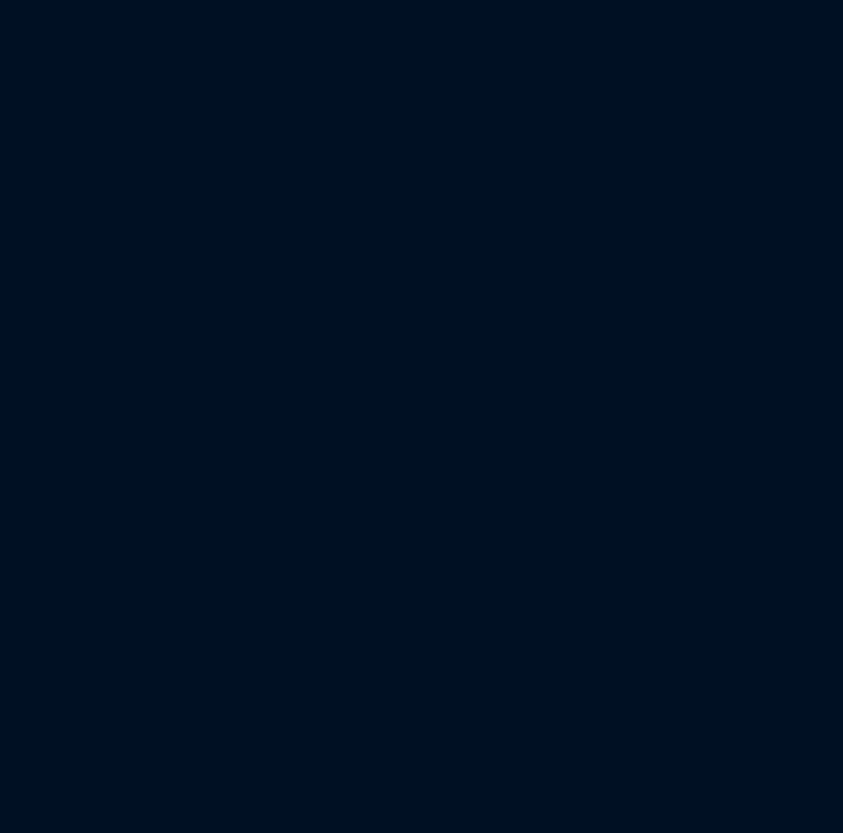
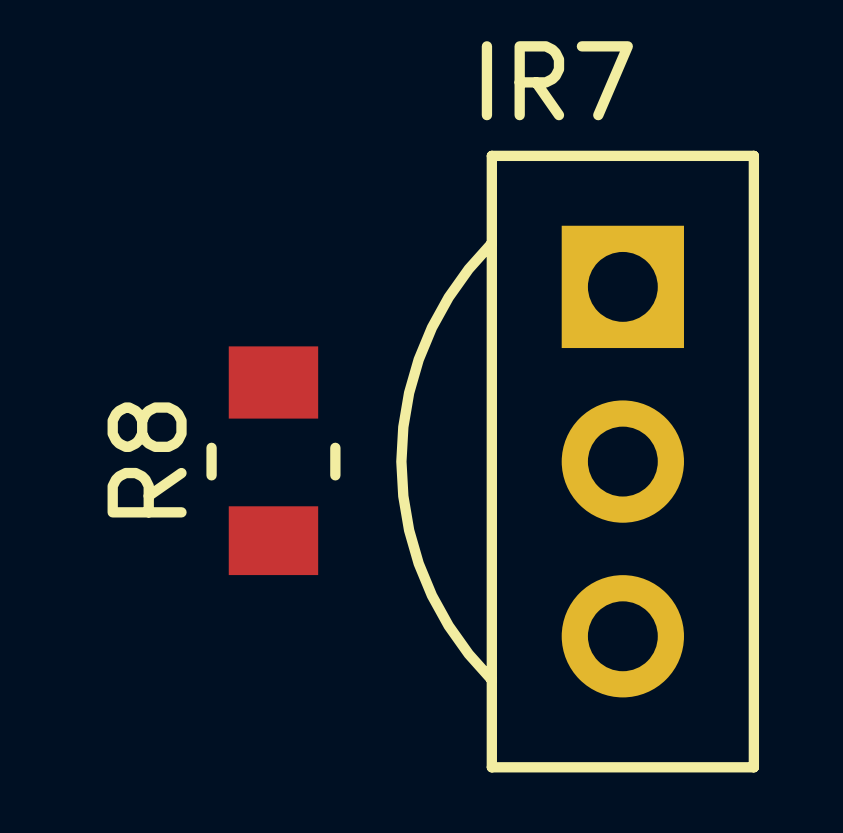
R8: none -> (273, 460)
IR7: none -> (577, 461)

